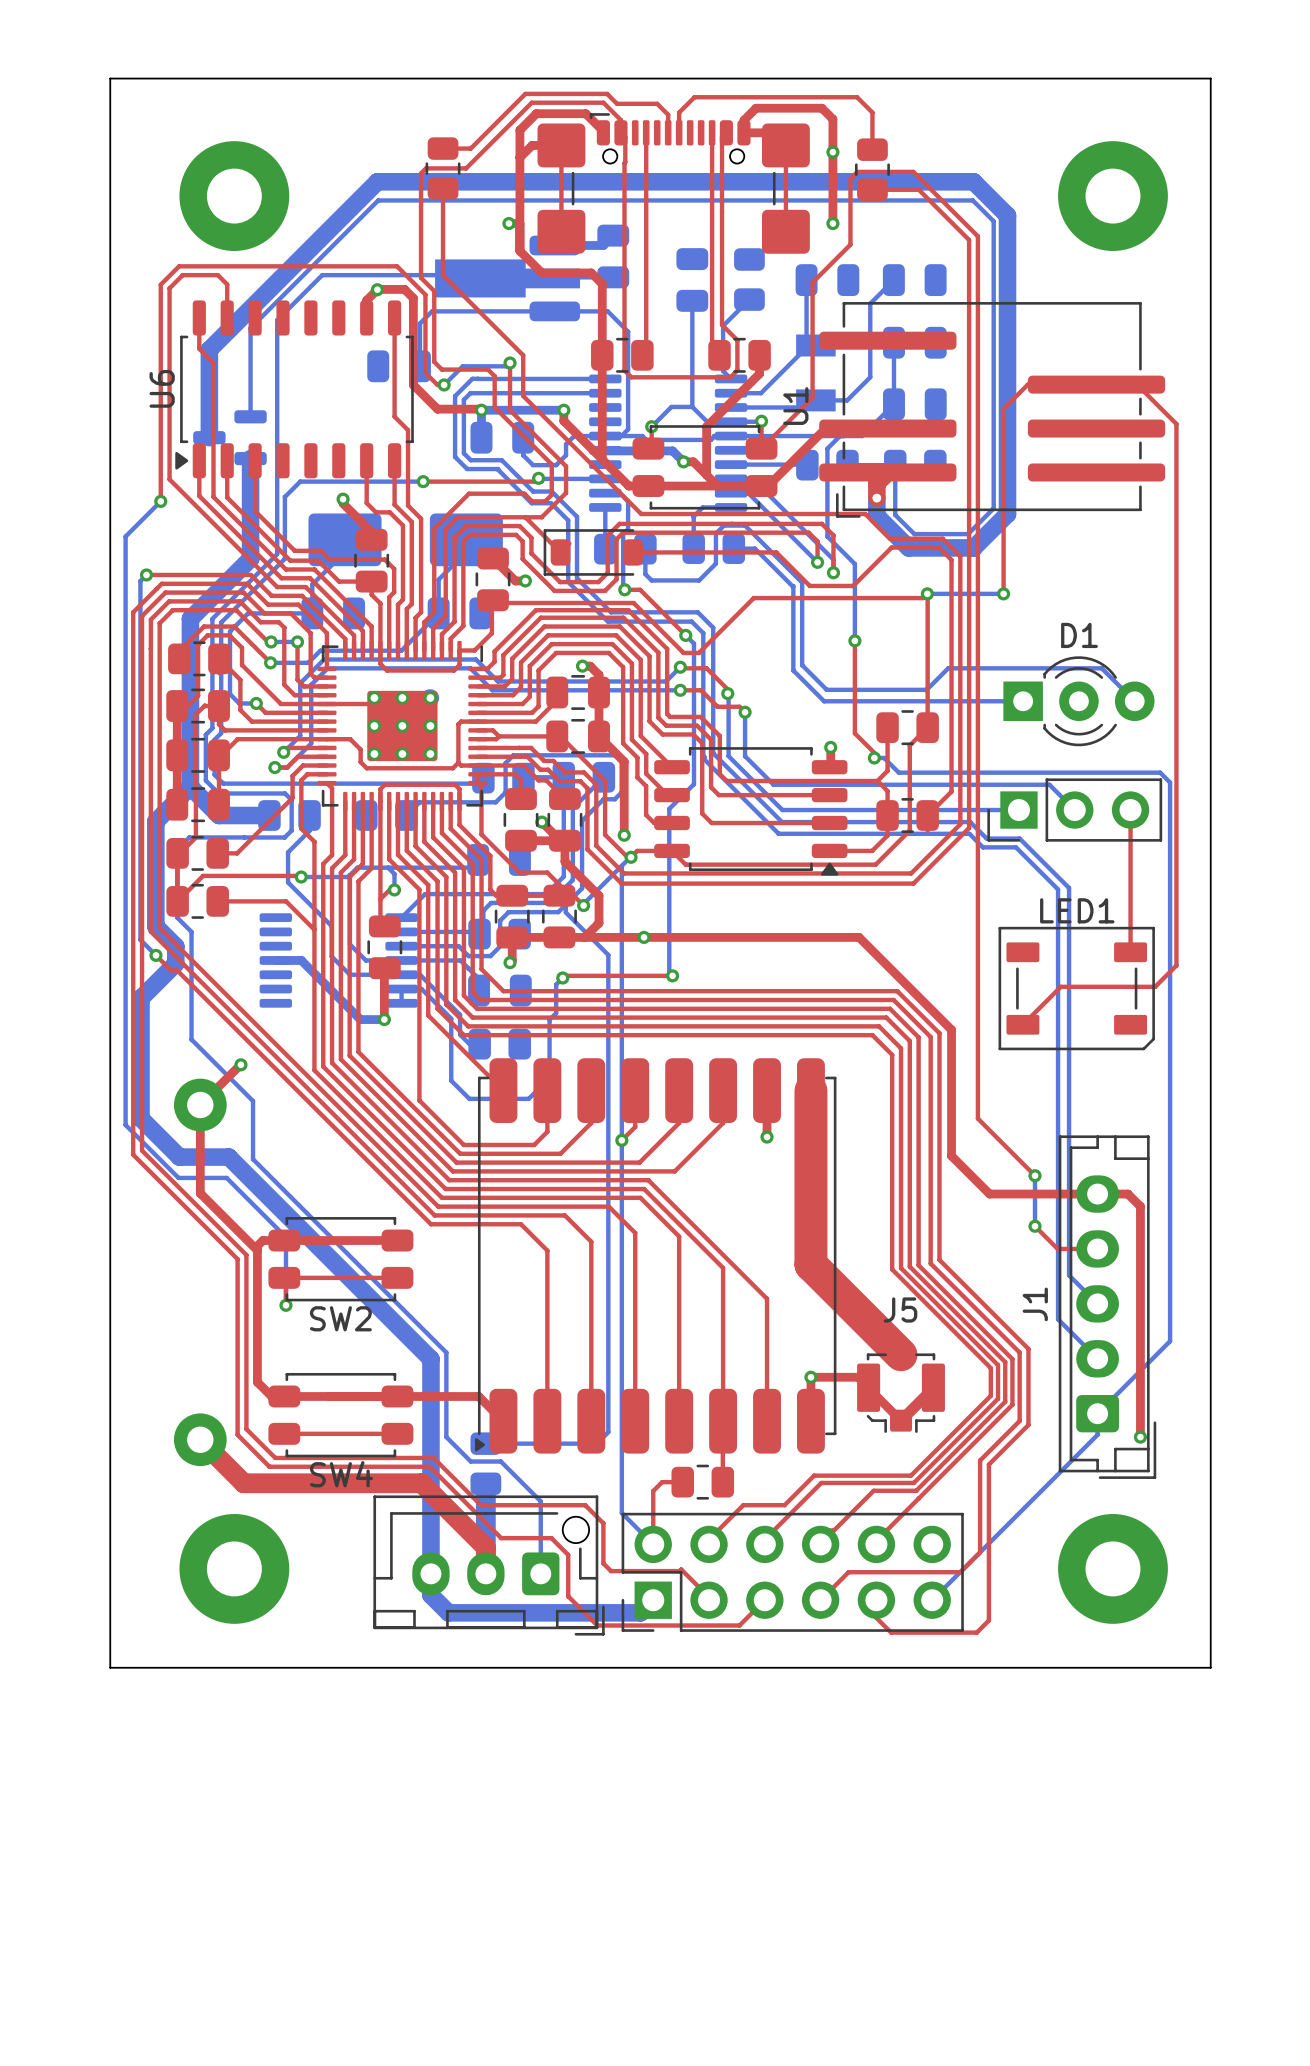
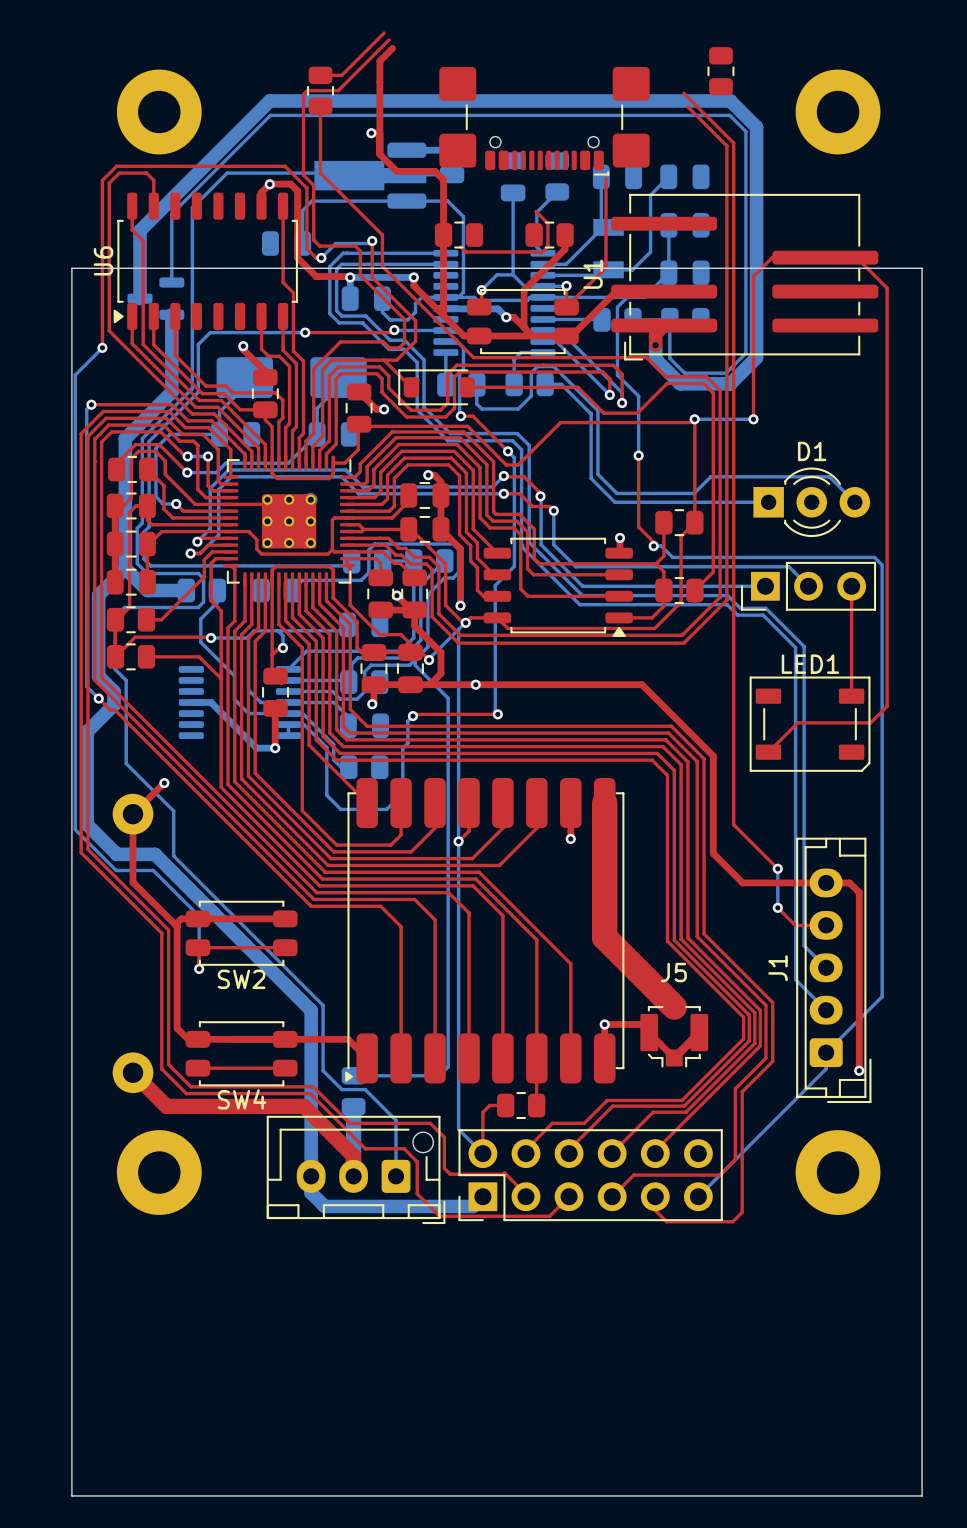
board edge: (110, 78) (1210, 78) (1210, 1667) (110, 1667) (110, 78) -> (71, 268) (922, 268) (922, 1495) (71, 1495) (71, 268)
top track: (525, 93) (607, 93) (617, 103) (657, 103) (668, 114) (668, 132) -> none
top track: (531, 102) (603, 102) (620, 120) (620, 132) (625, 137) (624, 370) -> none
top track: (536, 113) (585, 113) (603, 132) -> none
top track: (646, 132) (646, 351) -> none
top track: (679, 132) (679, 112) (694, 97) (857, 97) (872, 112) (872, 149) -> none
top track: (712, 132) (712, 347) -> none
top track: (726, 132) (722, 137) (722, 324) -> none
via: (832, 152) -> none
top track: (519, 157) (532, 145) (561, 145) (561, 231) -> none
part position: (872, 169) -> (720, 71)
top track: (857, 171) (913, 171) -> none
top track: (850, 178) (850, 244) (812, 282) -> none
part rotation: 0° (673, 183) -> 180° (544, 121)
top track: (872, 189) (918, 189) -> none
top track: (832, 223) (832, 119) (821, 108) (756, 108) (743, 120) (743, 132) (773, 132) (785, 145) (785, 231) -> none
via: (832, 223) -> none

